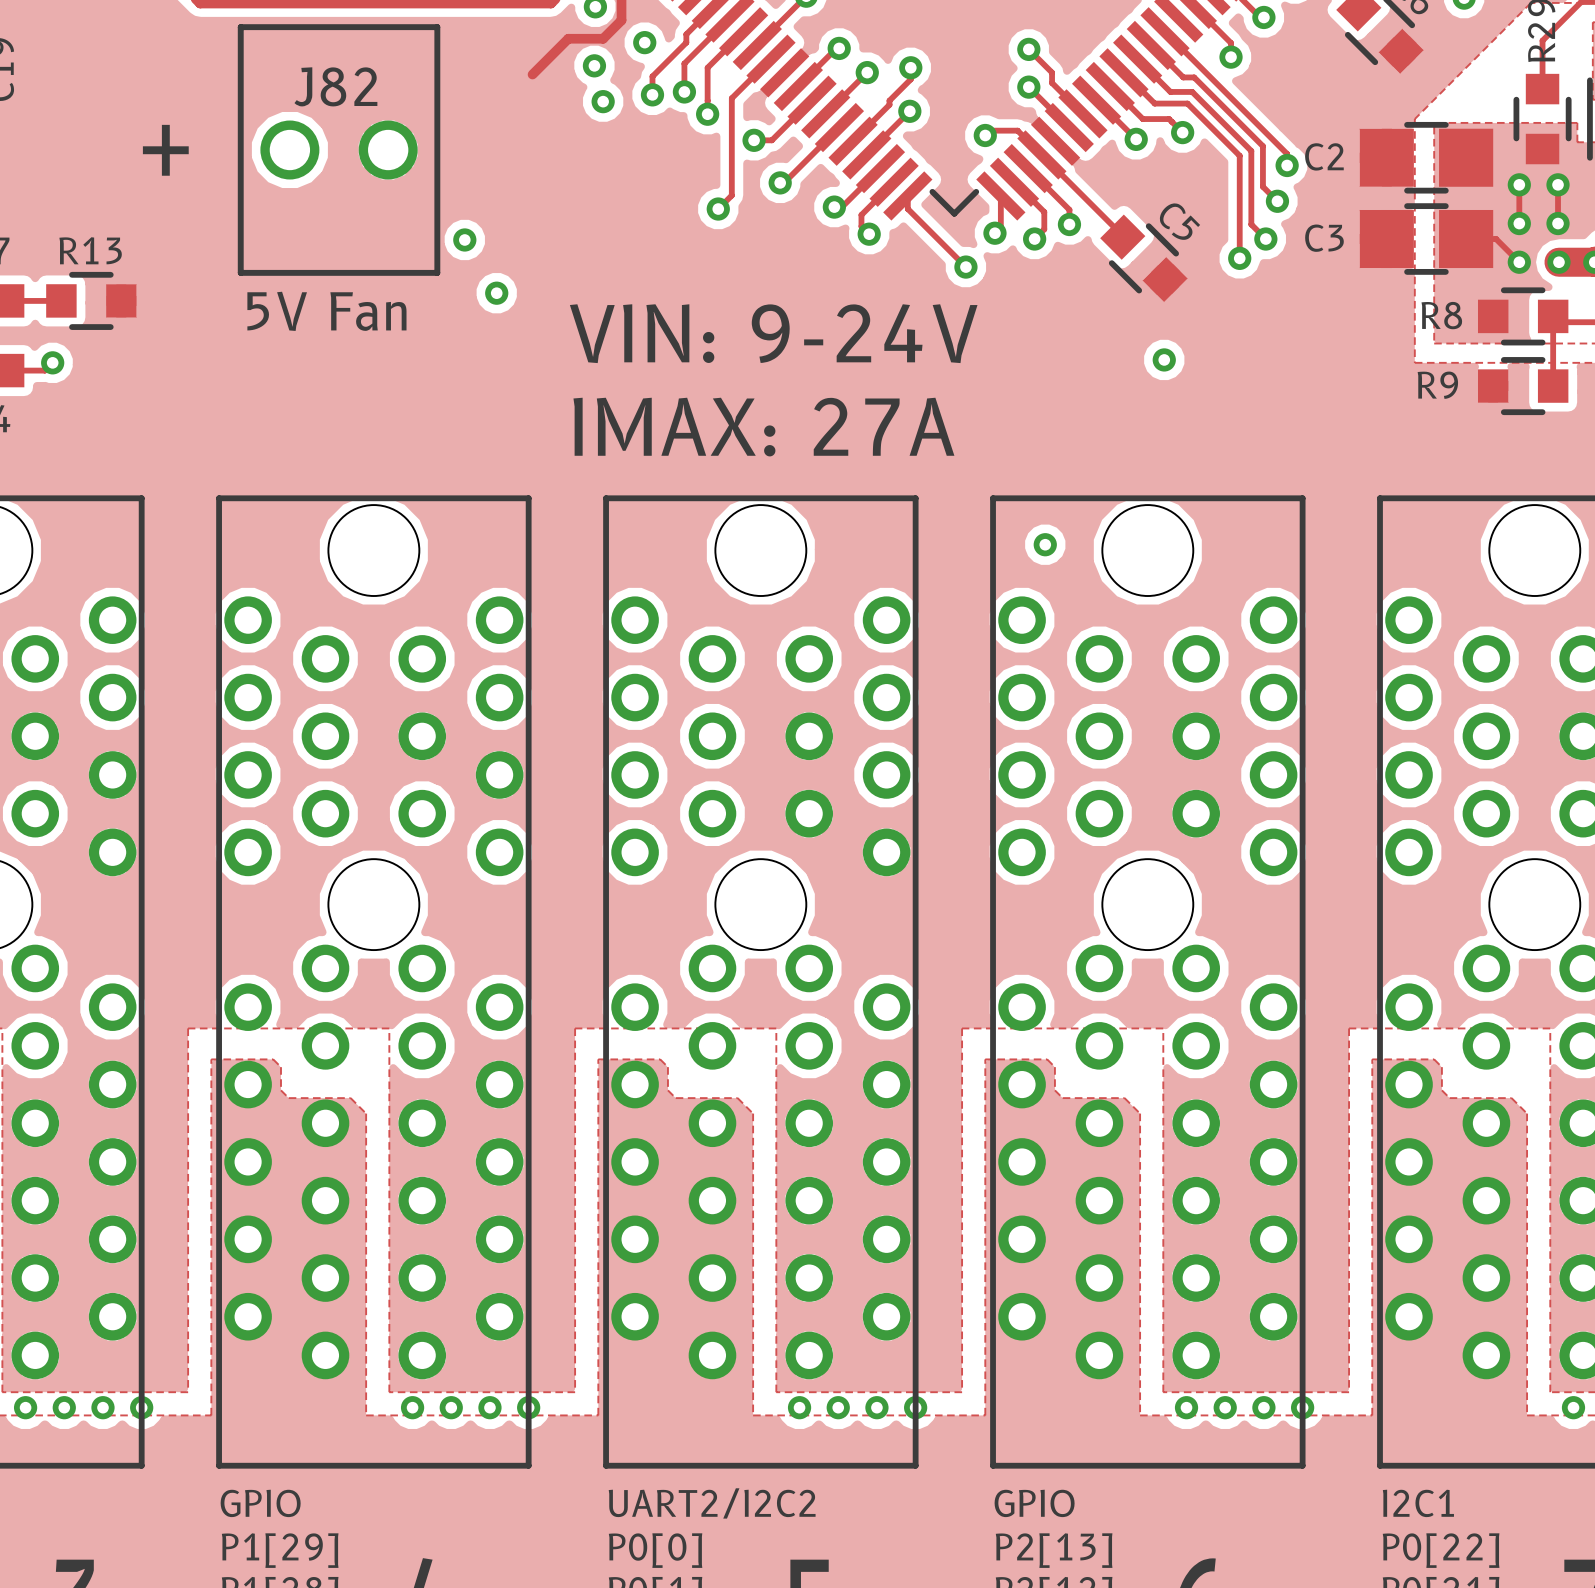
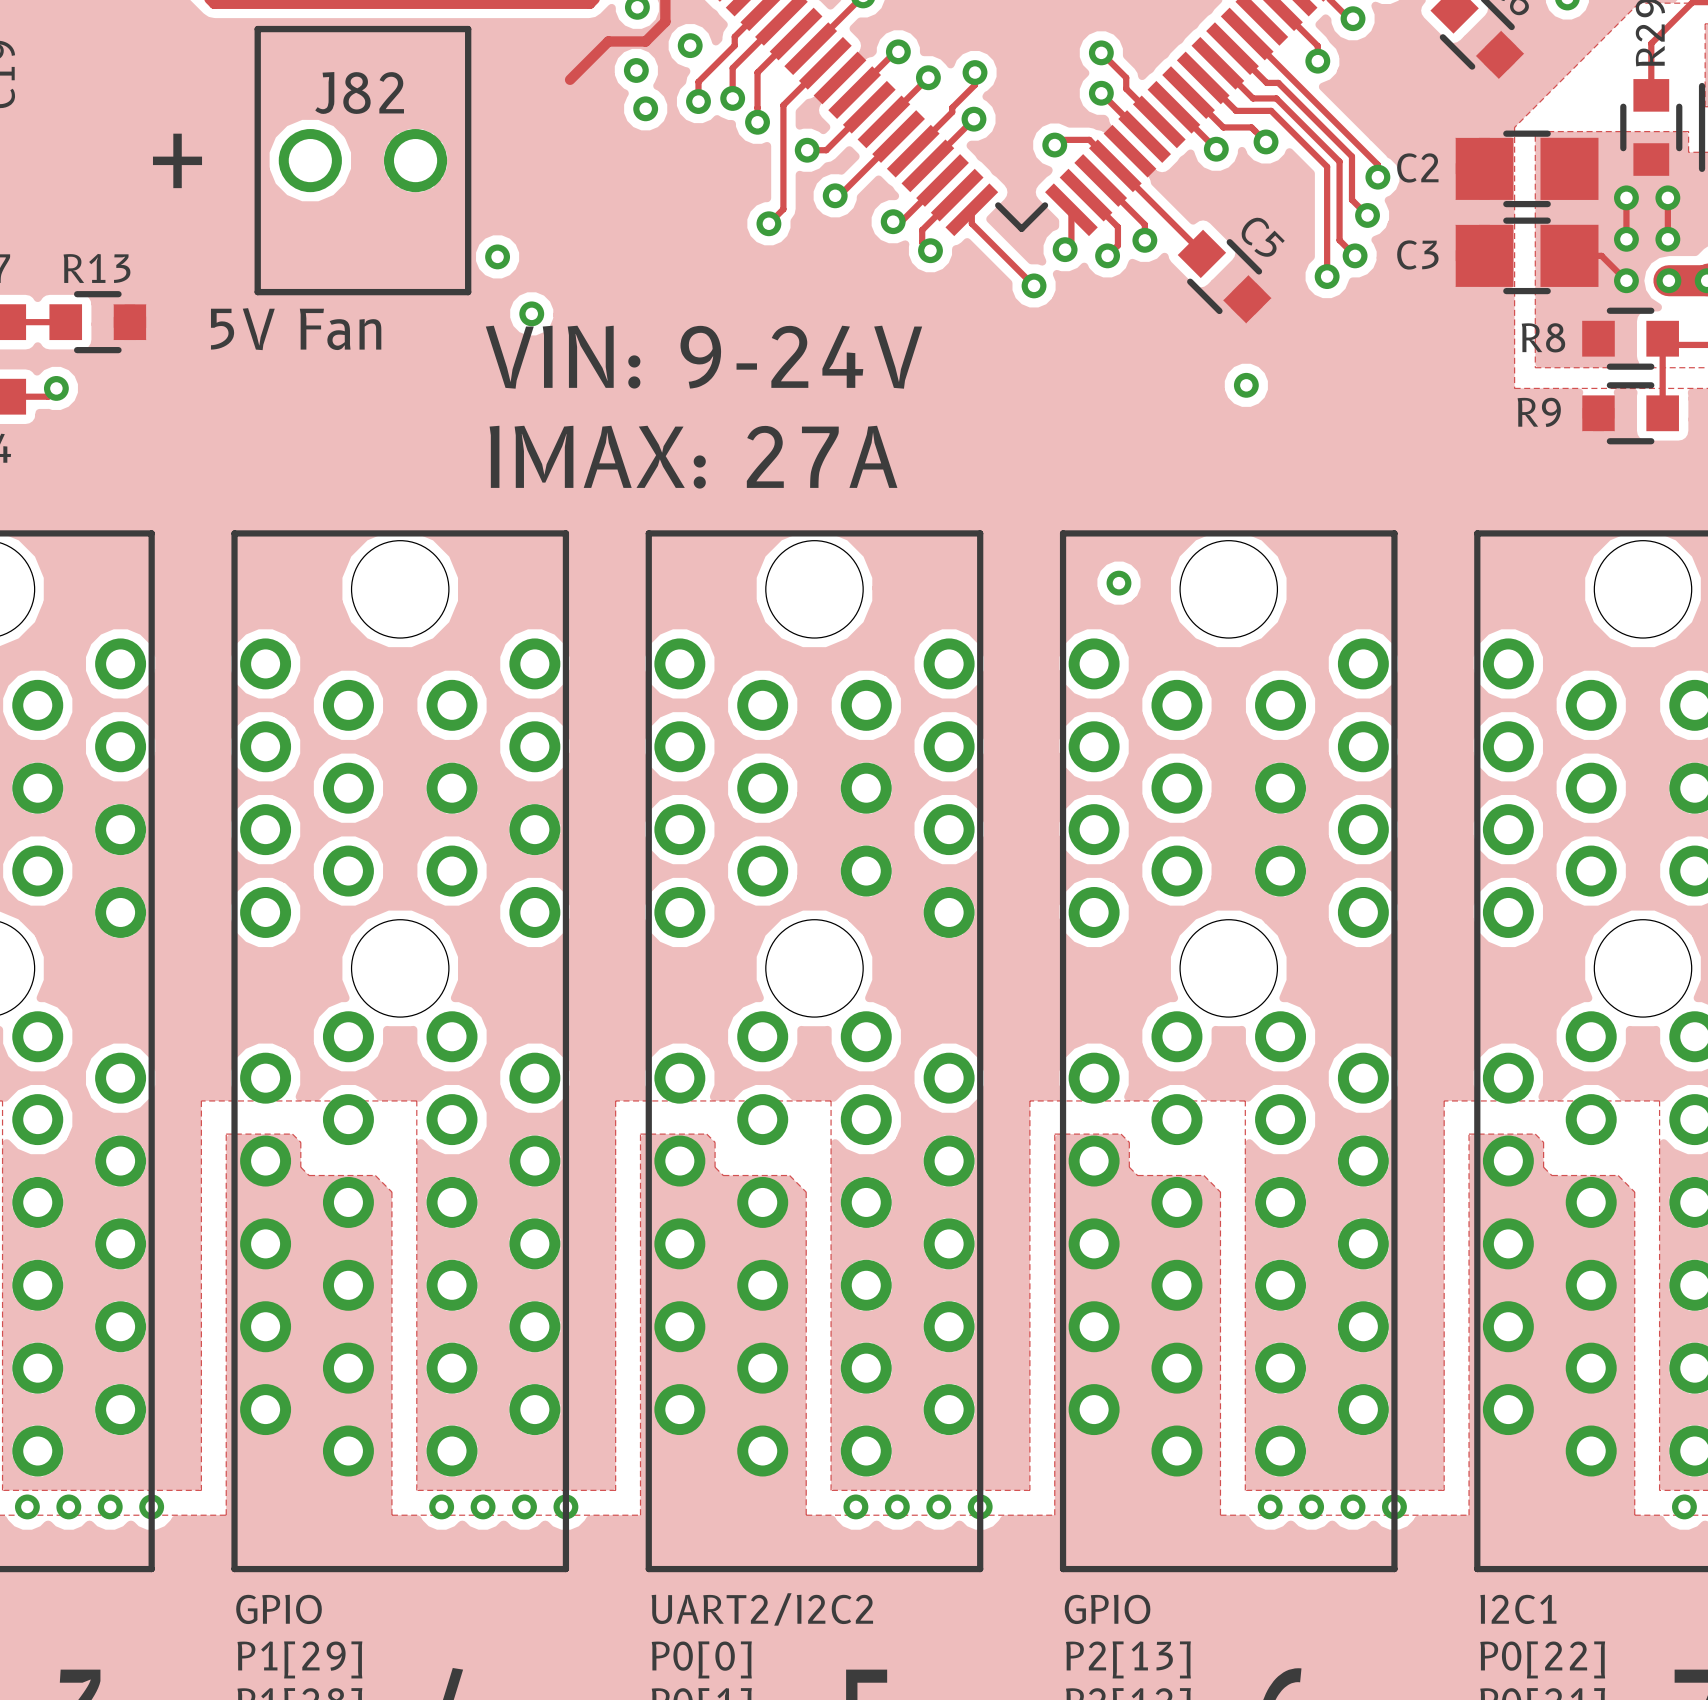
text position: 5V Fan (326, 311) -> 5V Fan (296, 329)
text position: VIN: 9-24V (773, 333) -> VIN: 9-24V (703, 357)
text position: IMAX: 27A (763, 427) -> IMAX: 27A (693, 457)

